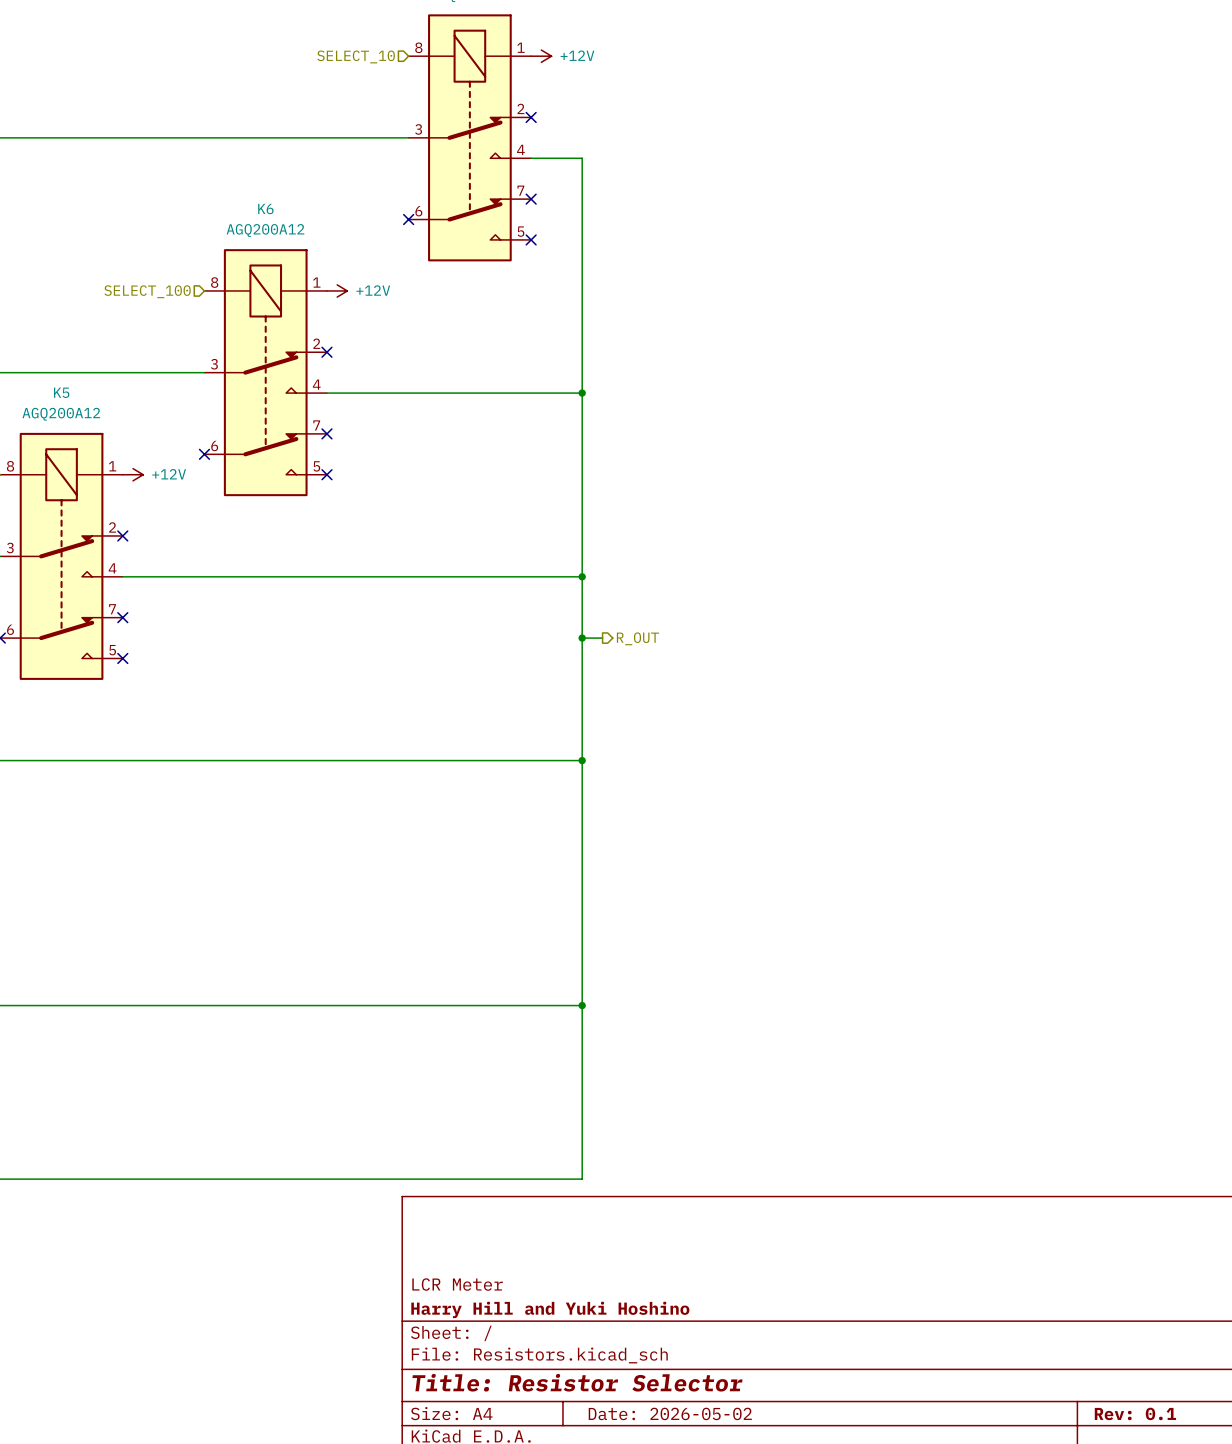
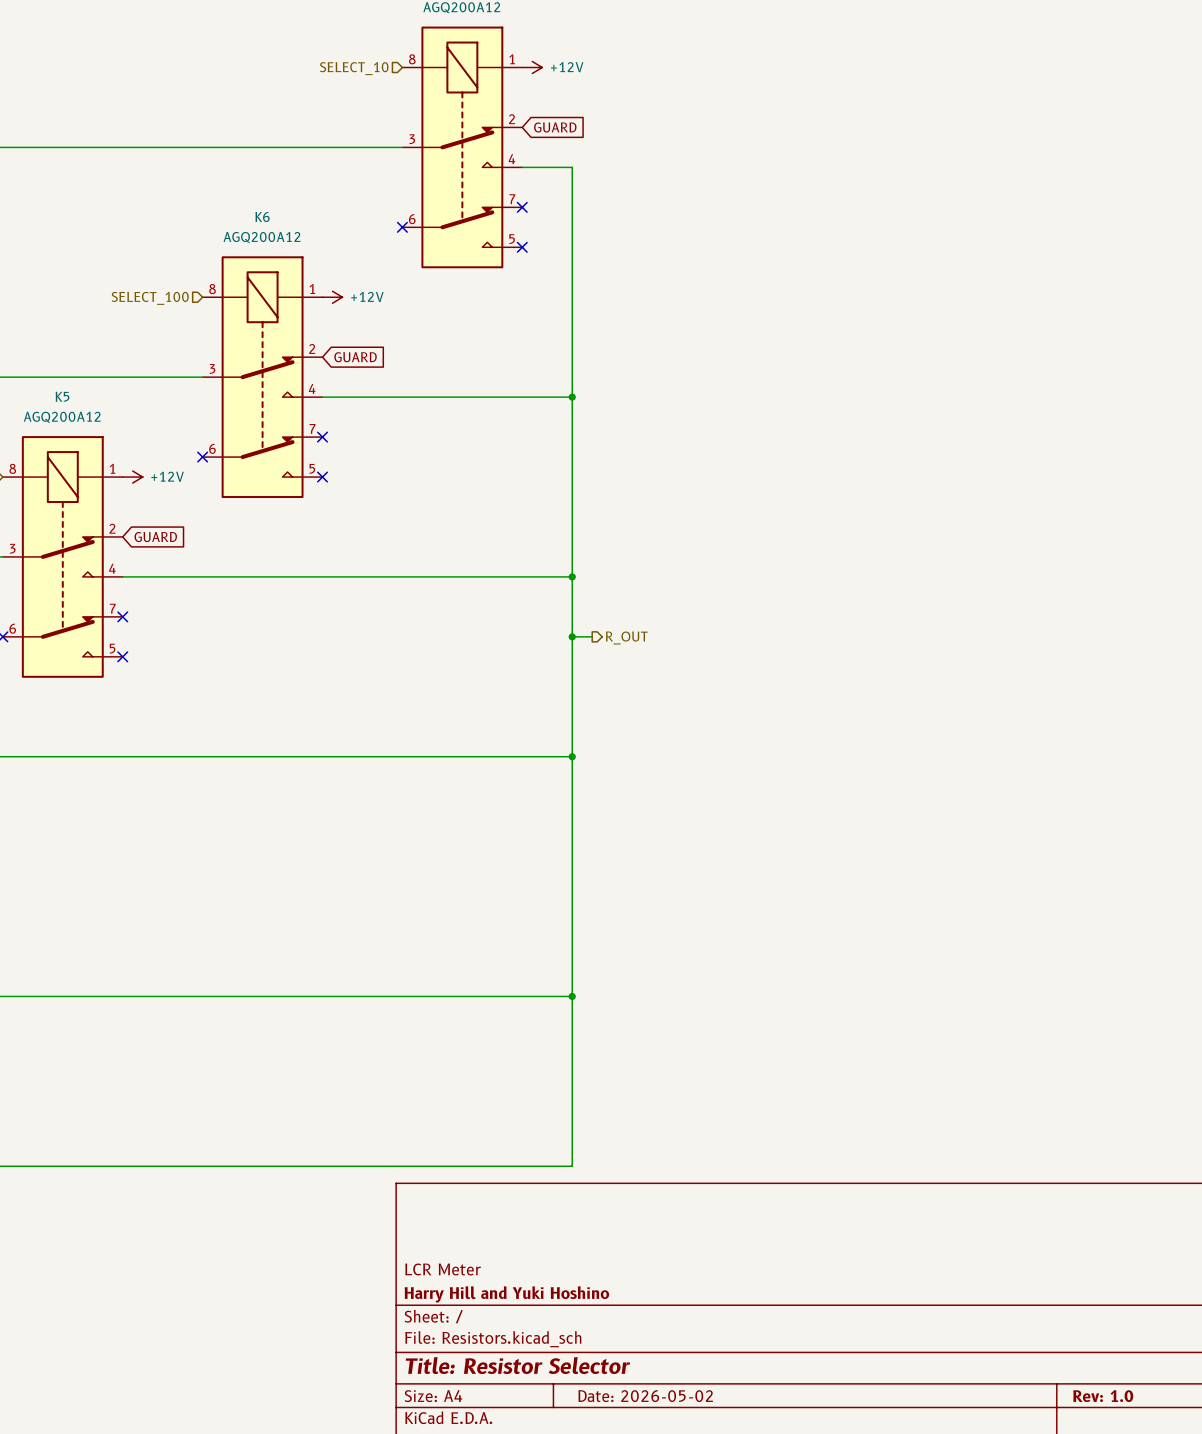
no-connect mark: (531, 117) -> none
global label: none -> GUARD (555, 127)
no-connect mark: (326, 352) -> none
global label: none -> GUARD (355, 357)
no-connect mark: (122, 535) -> none
global label: none -> GUARD (155, 537)
title block: Rev: 0.1 (1135, 1413) -> Rev: 1.0 (1103, 1396)

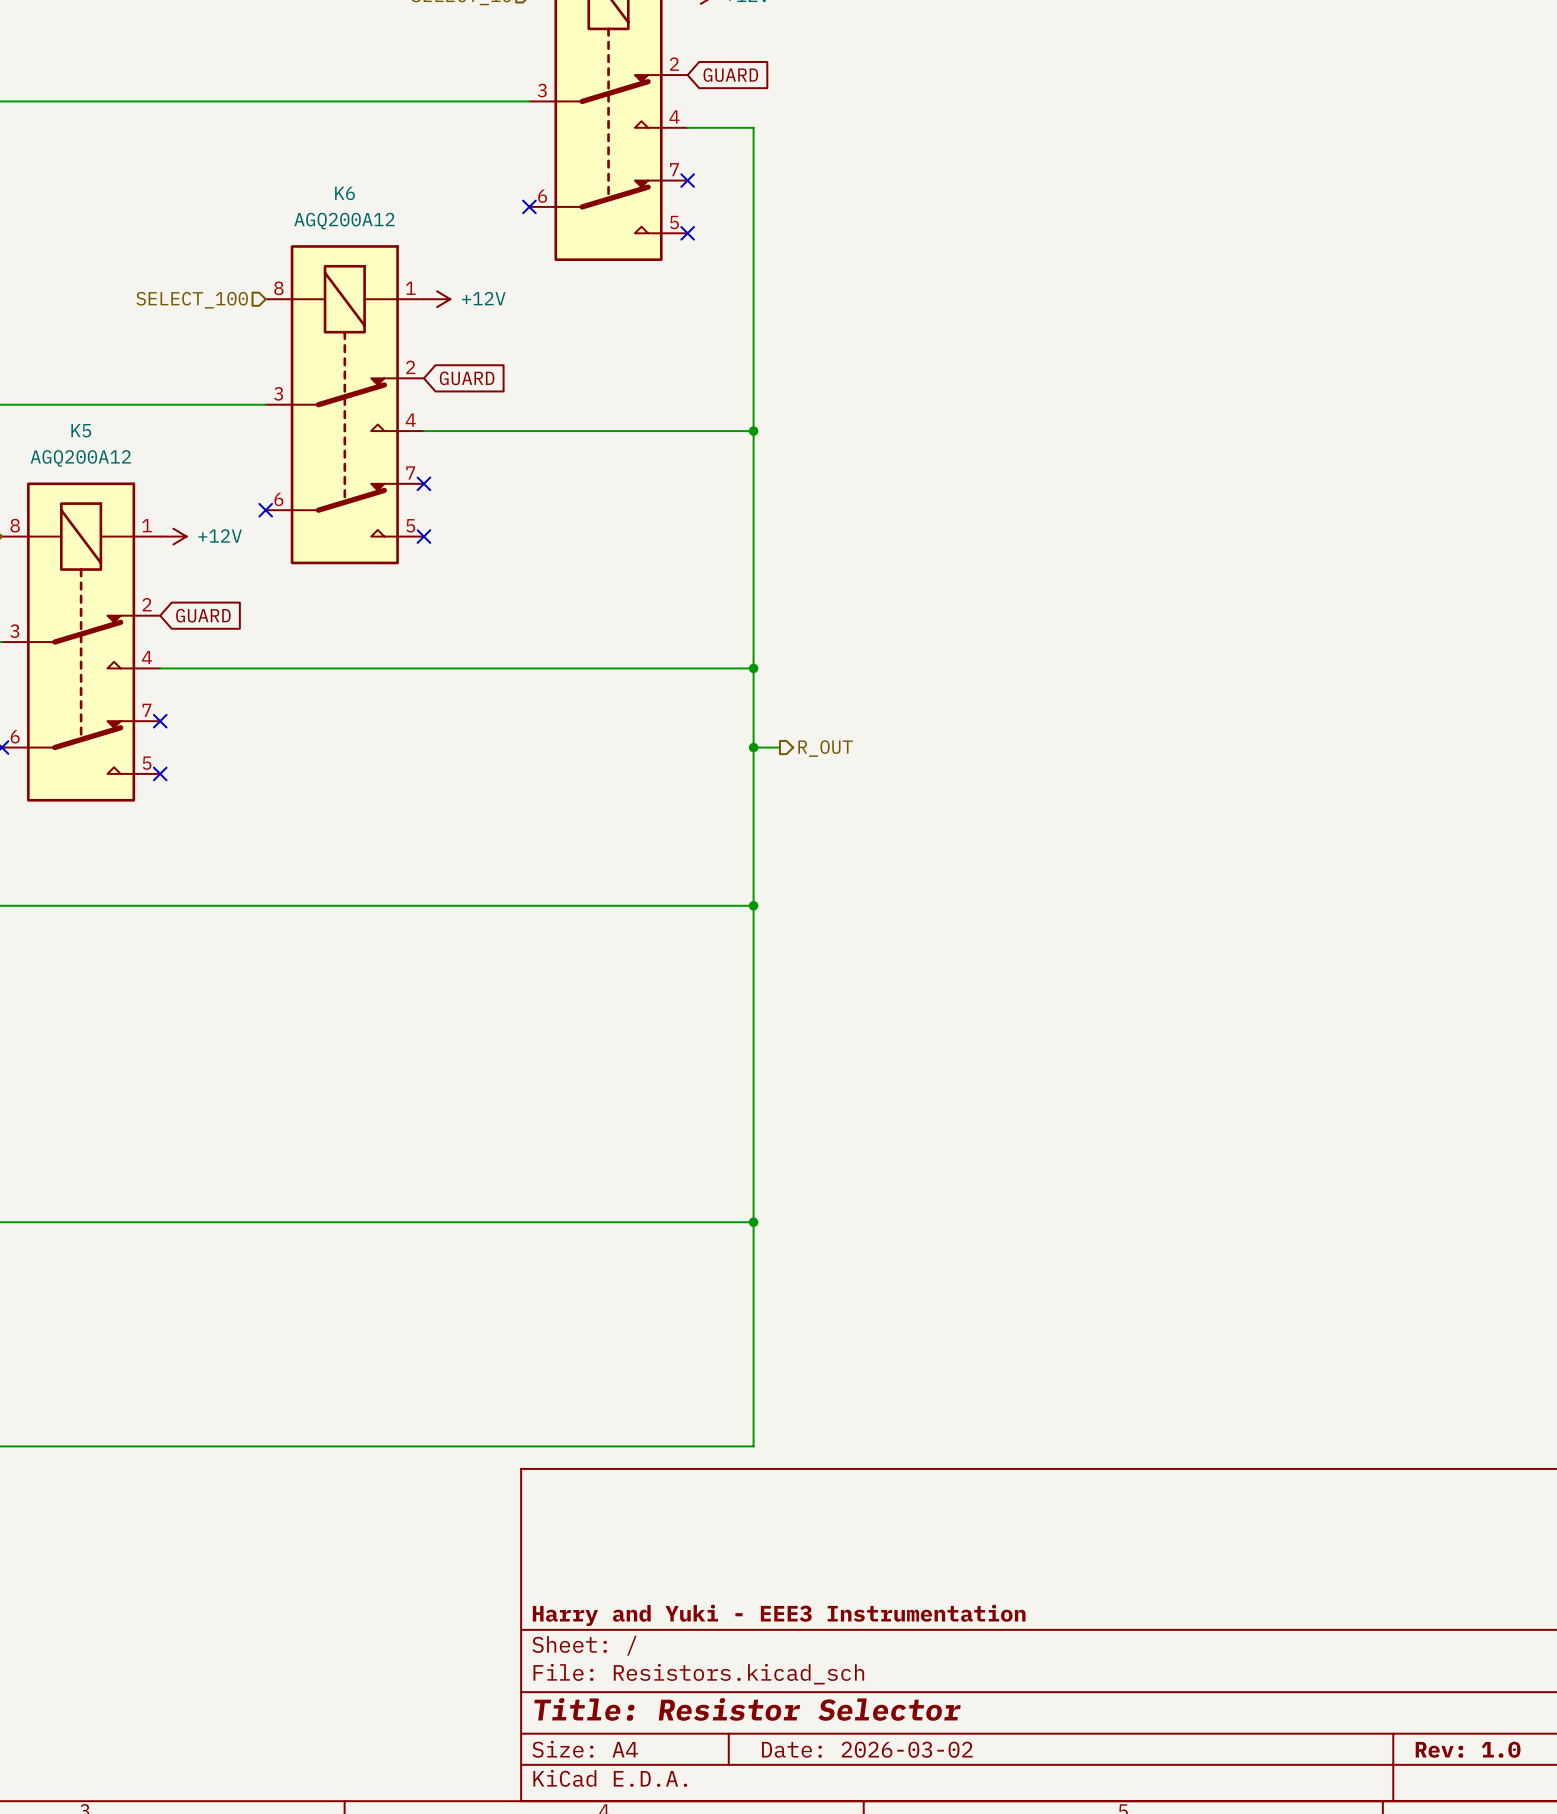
title block: LCR Meter (443, 1269) -> none
title block: Harry Hill and Yuki Hoshino (506, 1294) -> Harry and Yuki - EEE3 Instrumentation (779, 1615)
title block: Date: 2026-05-02 (645, 1396) -> Date: 2026-03-02 (867, 1749)

